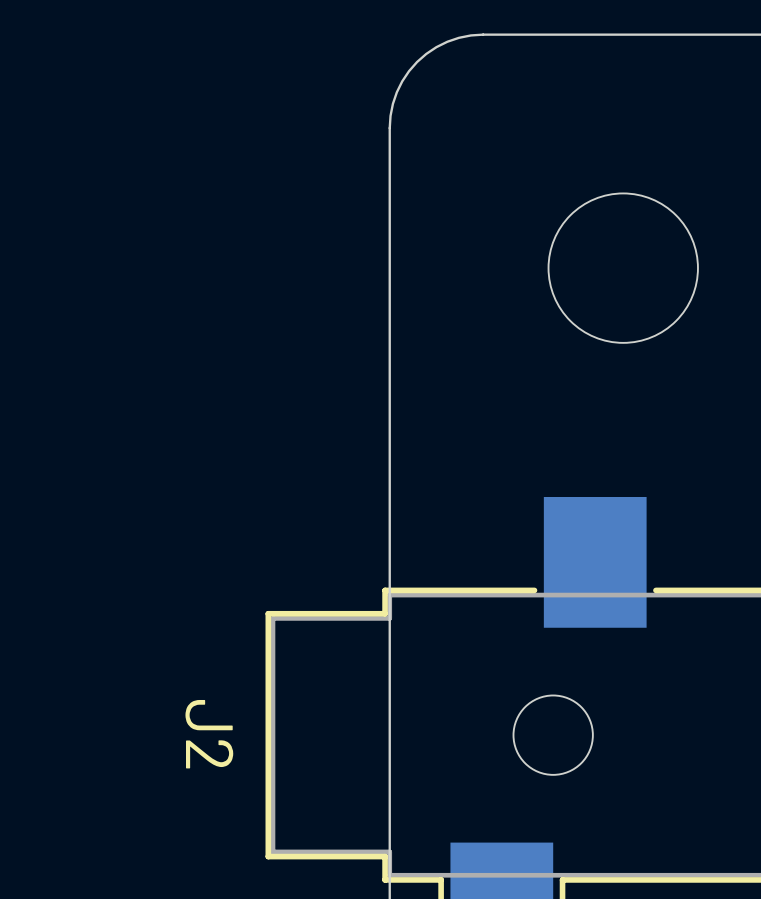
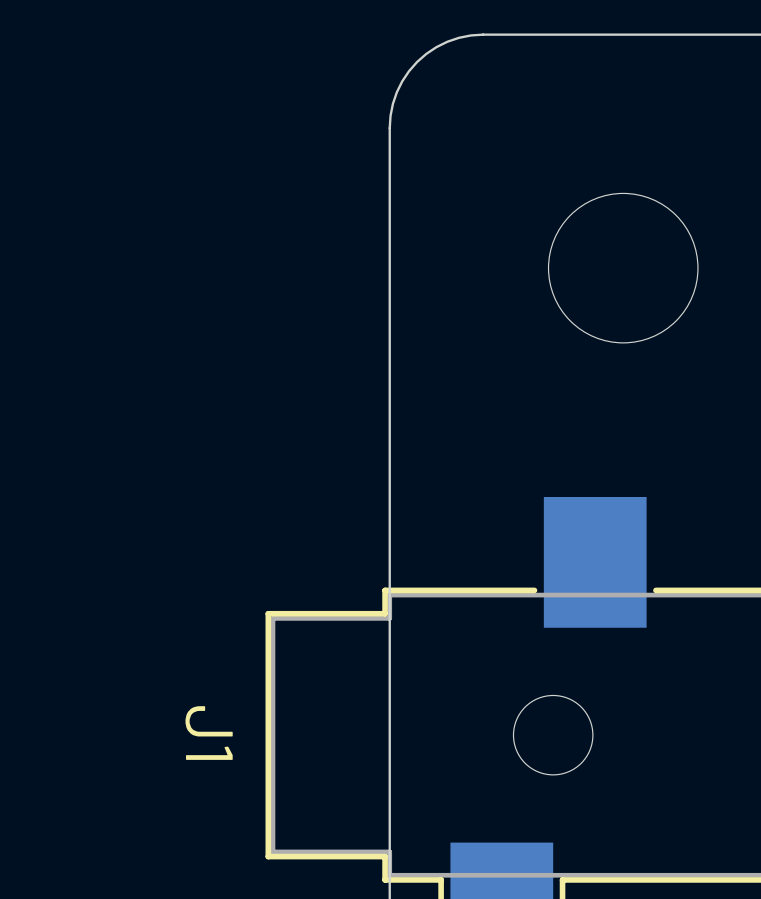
J2 name: J2 (209, 734) -> J1 (209, 733)

